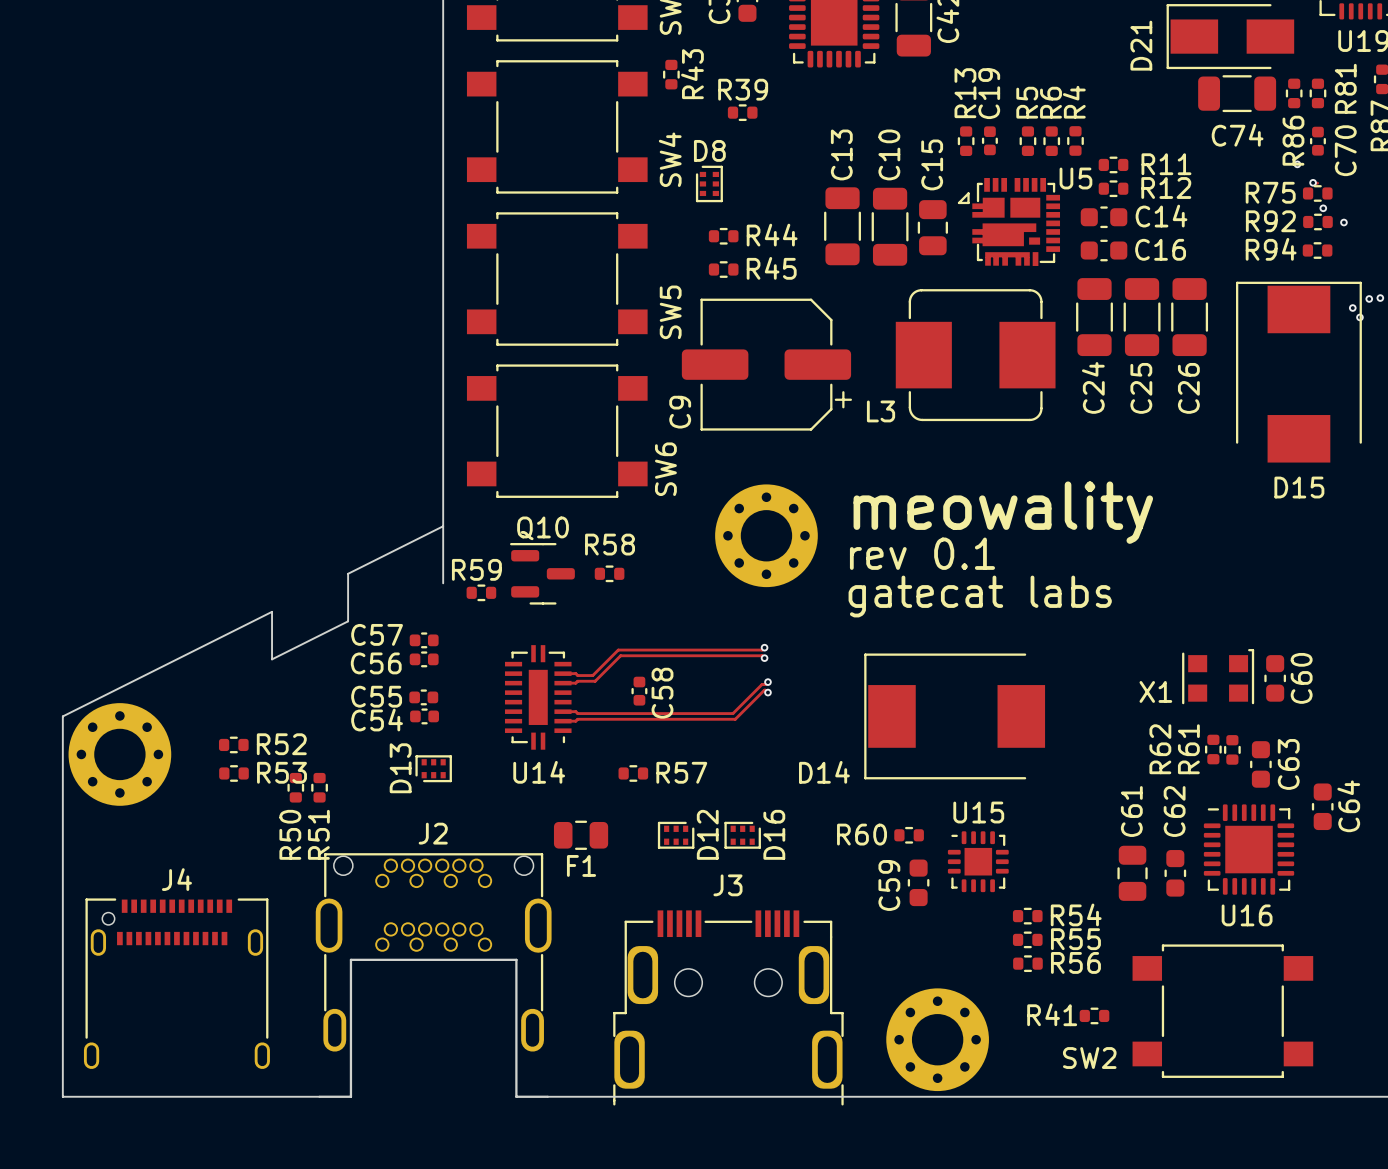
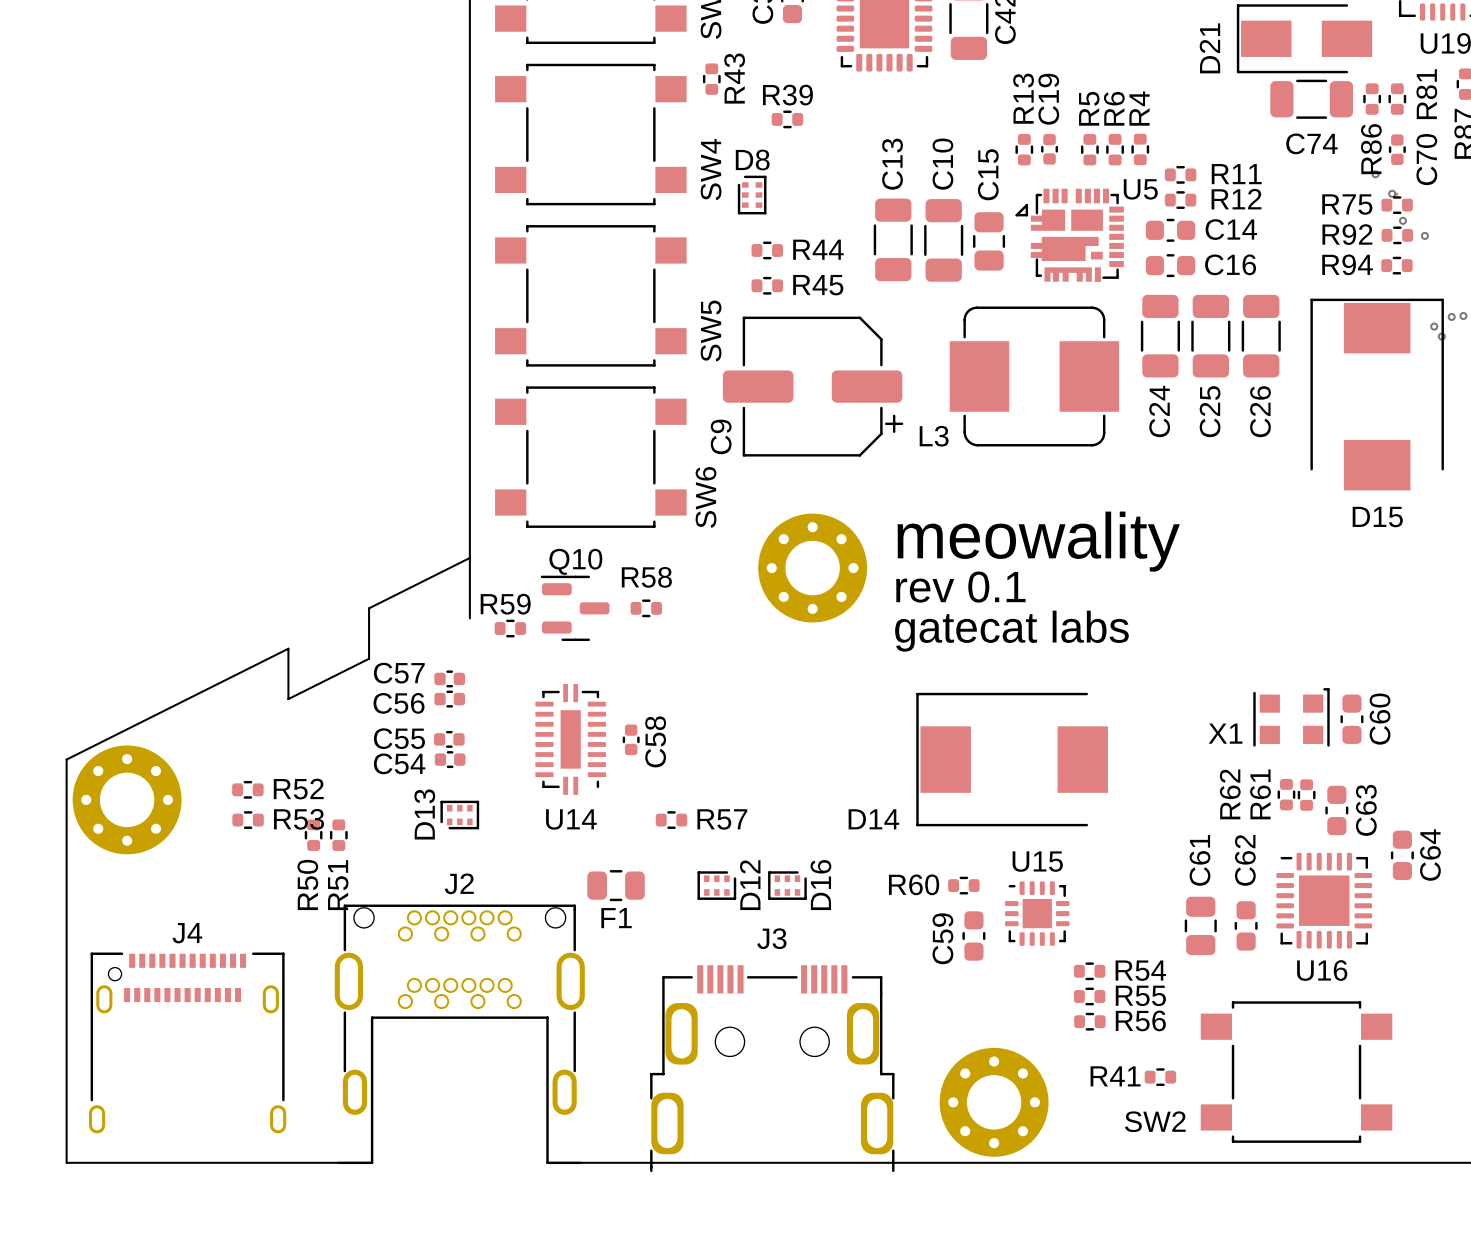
track: (764, 647) (762, 650) (618, 650) (592, 675) (562, 673) -> none
via: (764, 647) -> none
track: (764, 658) (762, 655) (620, 655) (595, 681) (562, 683) -> none
via: (764, 658) -> none
track: (767, 682) (762, 684) (732, 713) (577, 713) (575, 711) (562, 711) -> none
via: (767, 682) -> none
C58 position: (639, 691) -> (631, 739)
track: (767, 692) (764, 690) (735, 719) (577, 719) (575, 721) (562, 721) -> none
via: (767, 692) -> none

